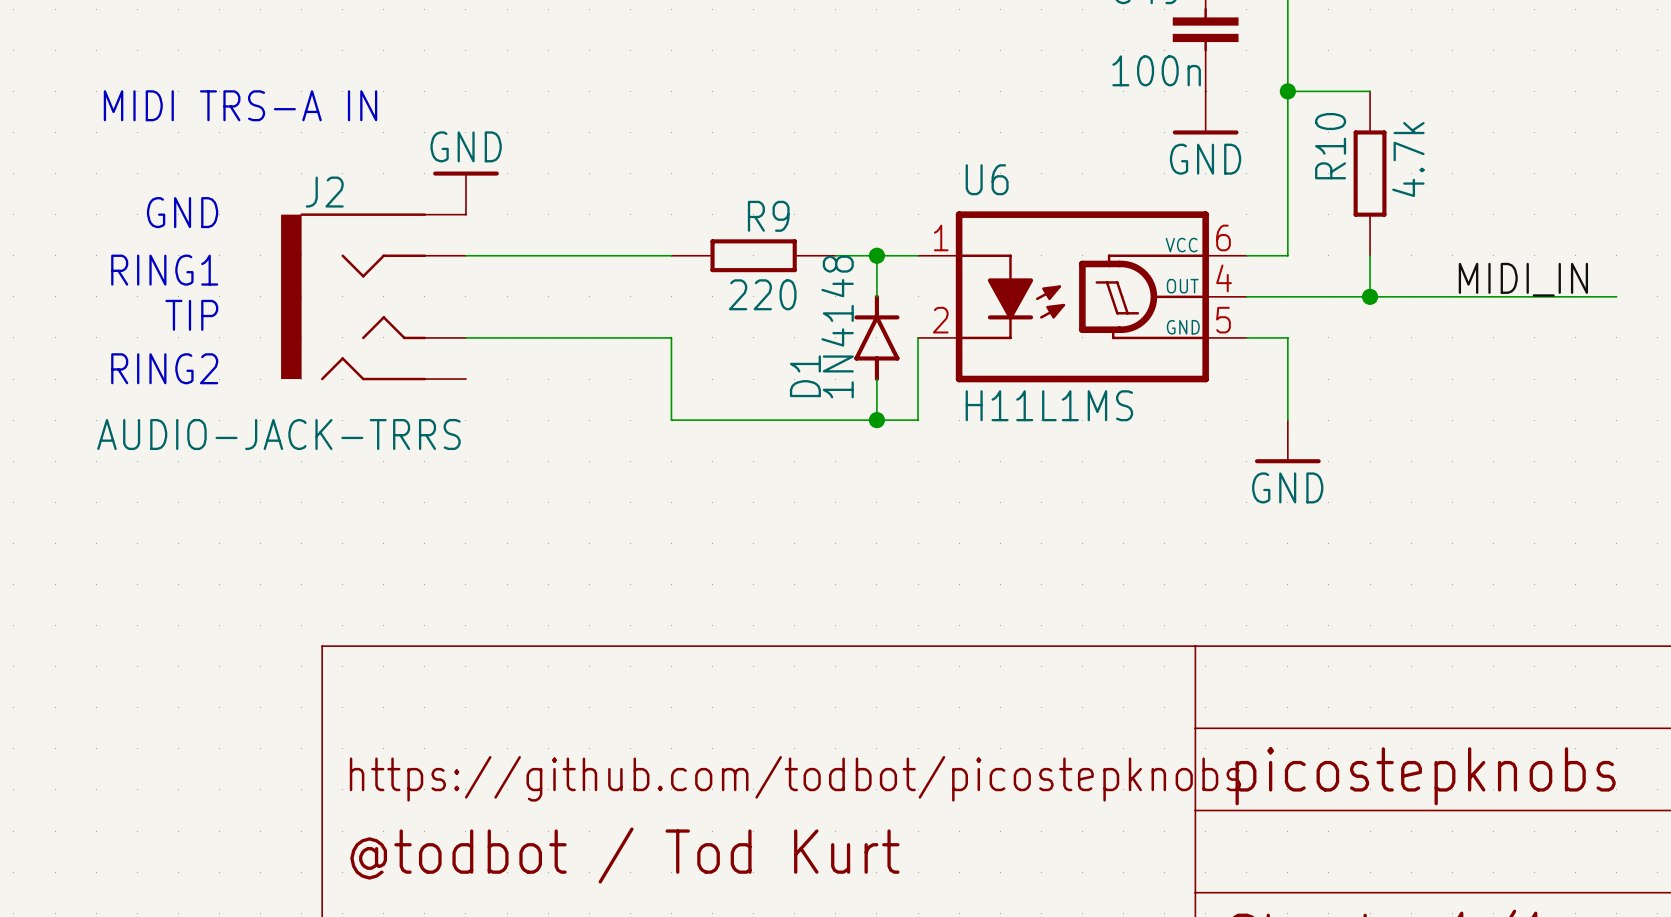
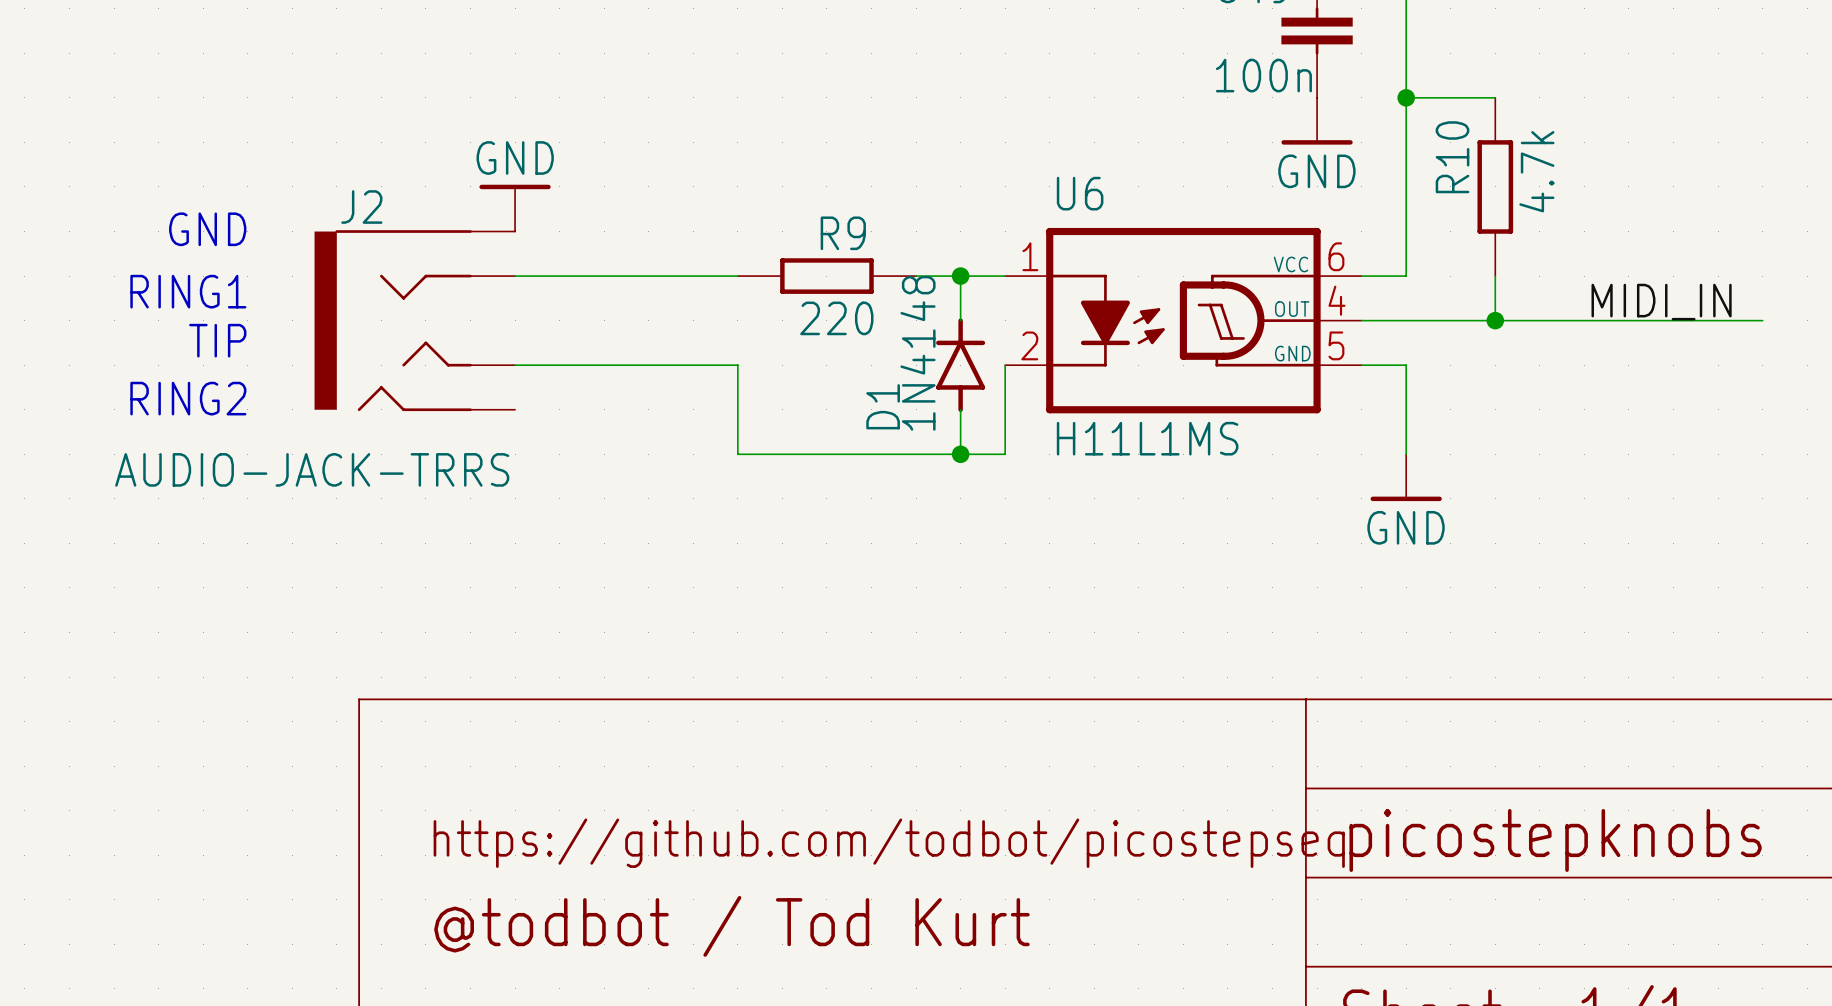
text: MIDI TRS-A IN (240, 105) -> none
text: https://github.com/todbot/picostepknobs (795, 778) -> https://github.com/todbot/picostepseq (889, 843)
text position: @todbot / Tod Kurt (624, 855) -> @todbot / Tod Kurt (731, 926)

